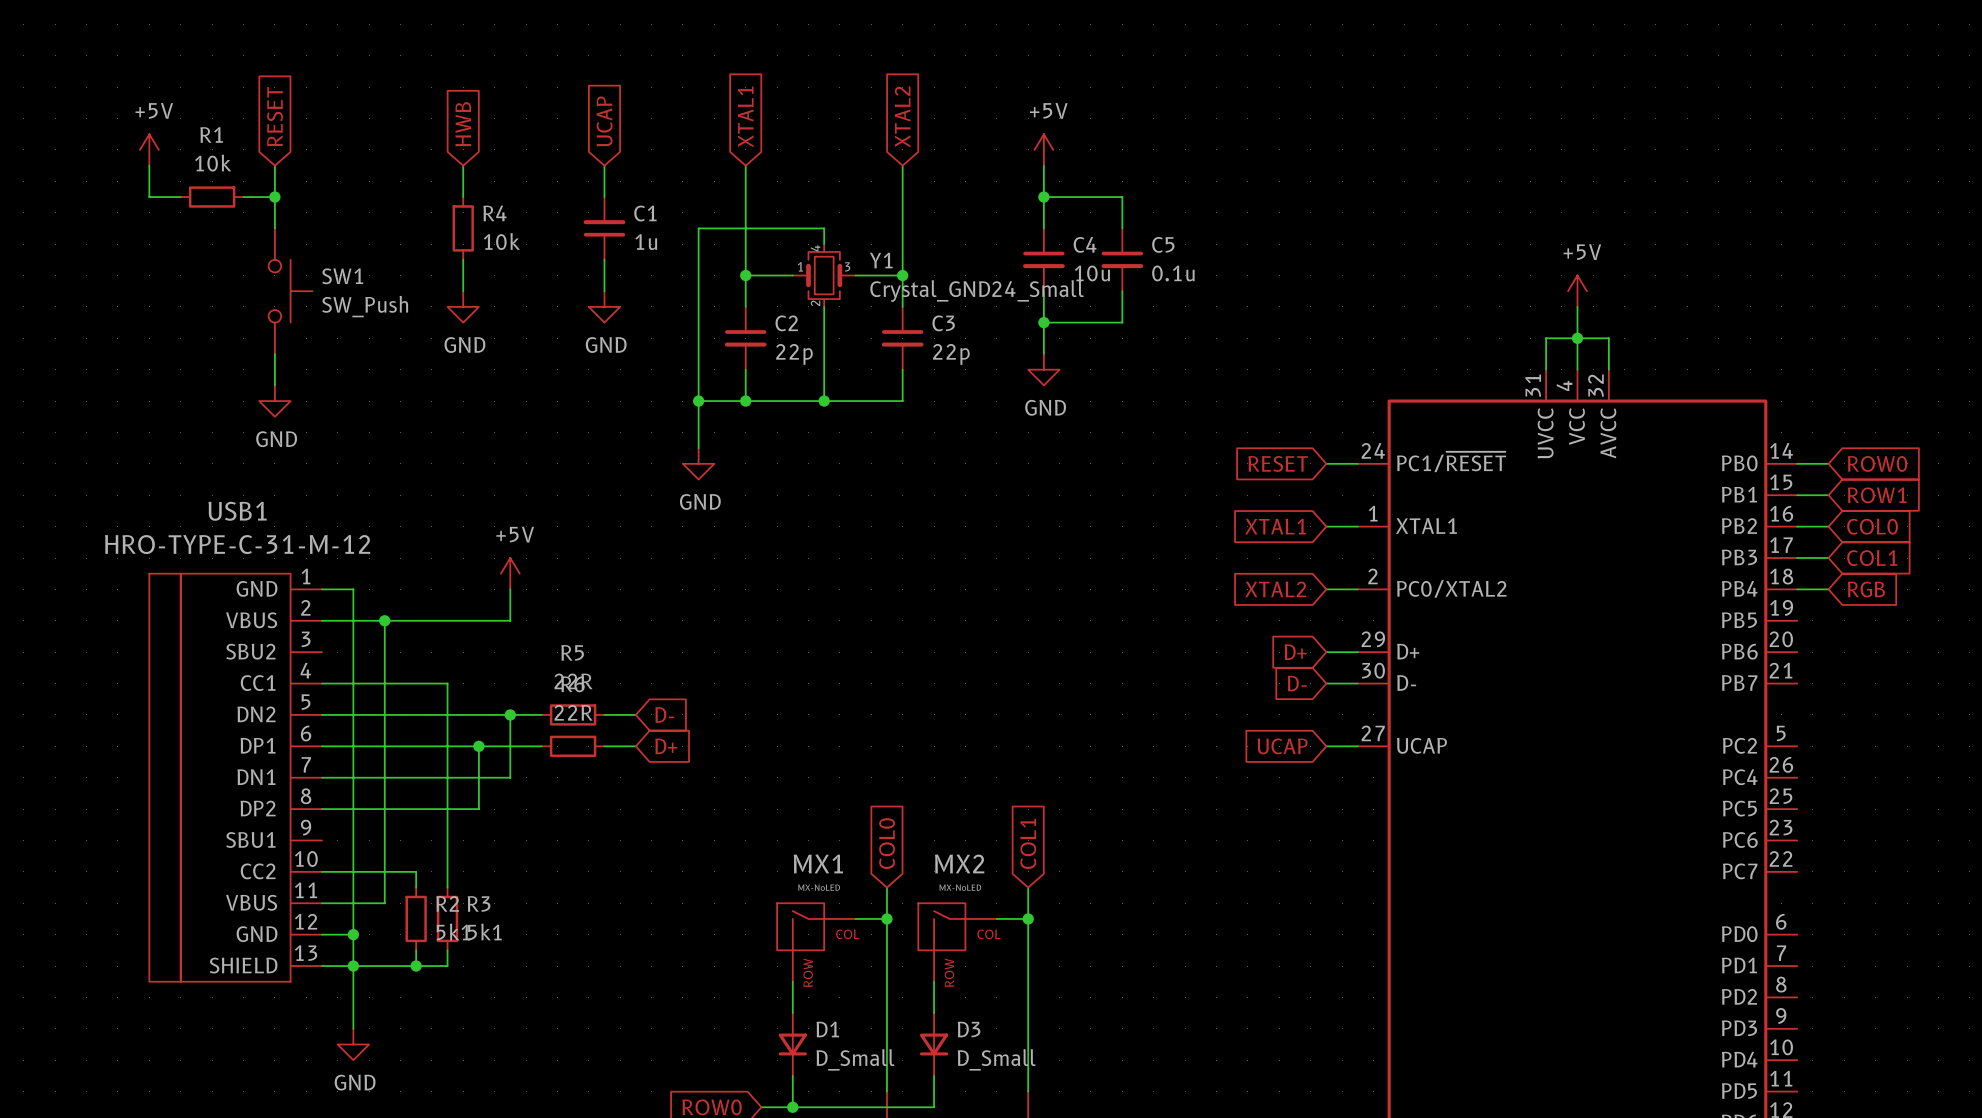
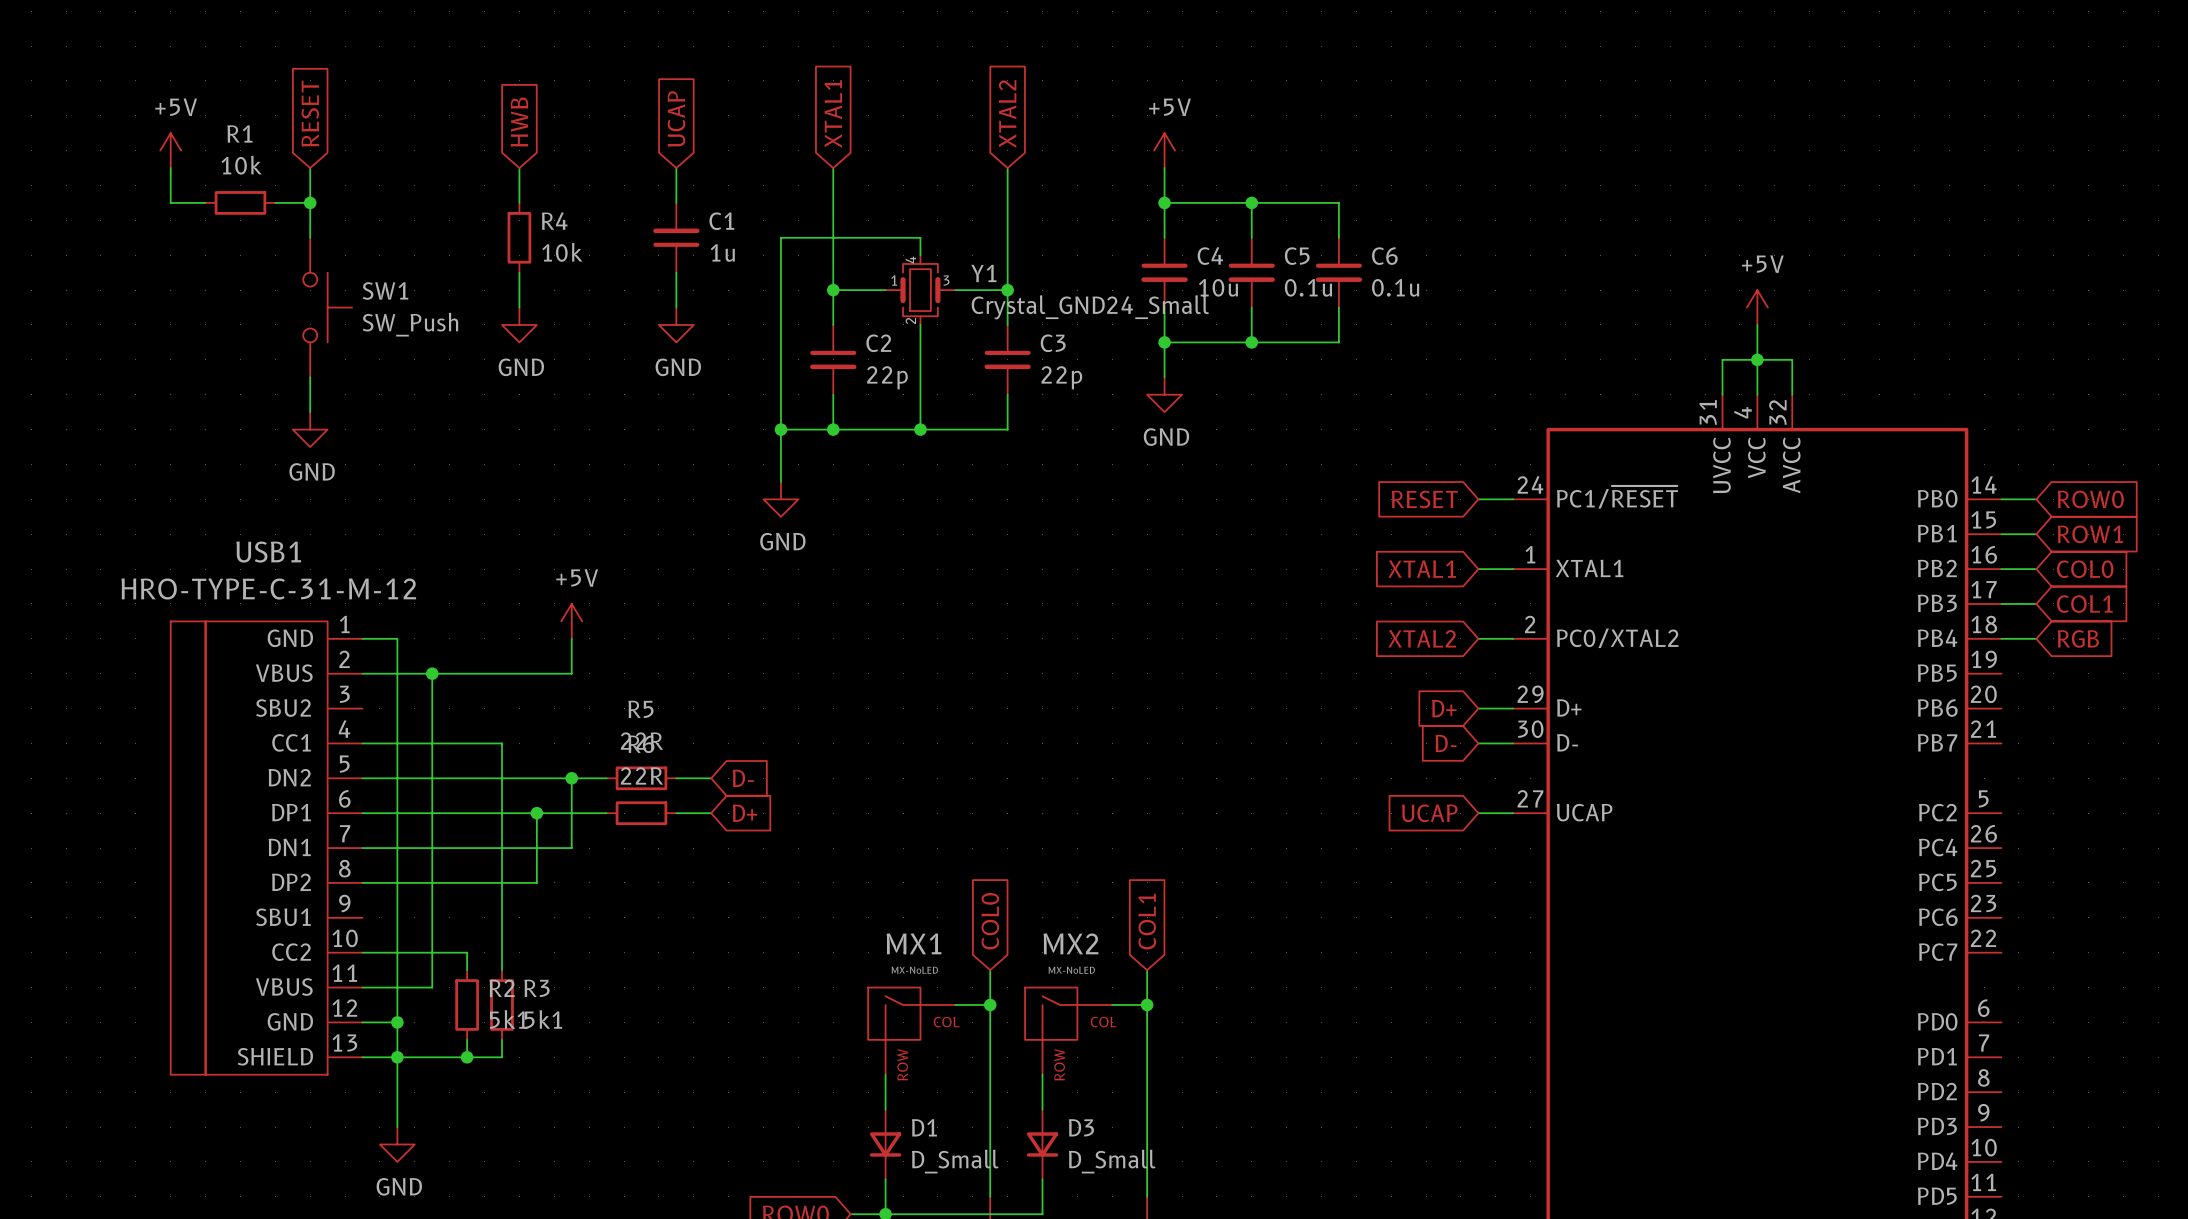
wire: none -> (1251, 202) (1338, 202) (1338, 237)
junction: none -> (1251, 202)
C6: none -> 0.1u (1338, 272)
wire: none -> (1338, 307) (1338, 342) (1251, 342)
junction: none -> (1251, 342)

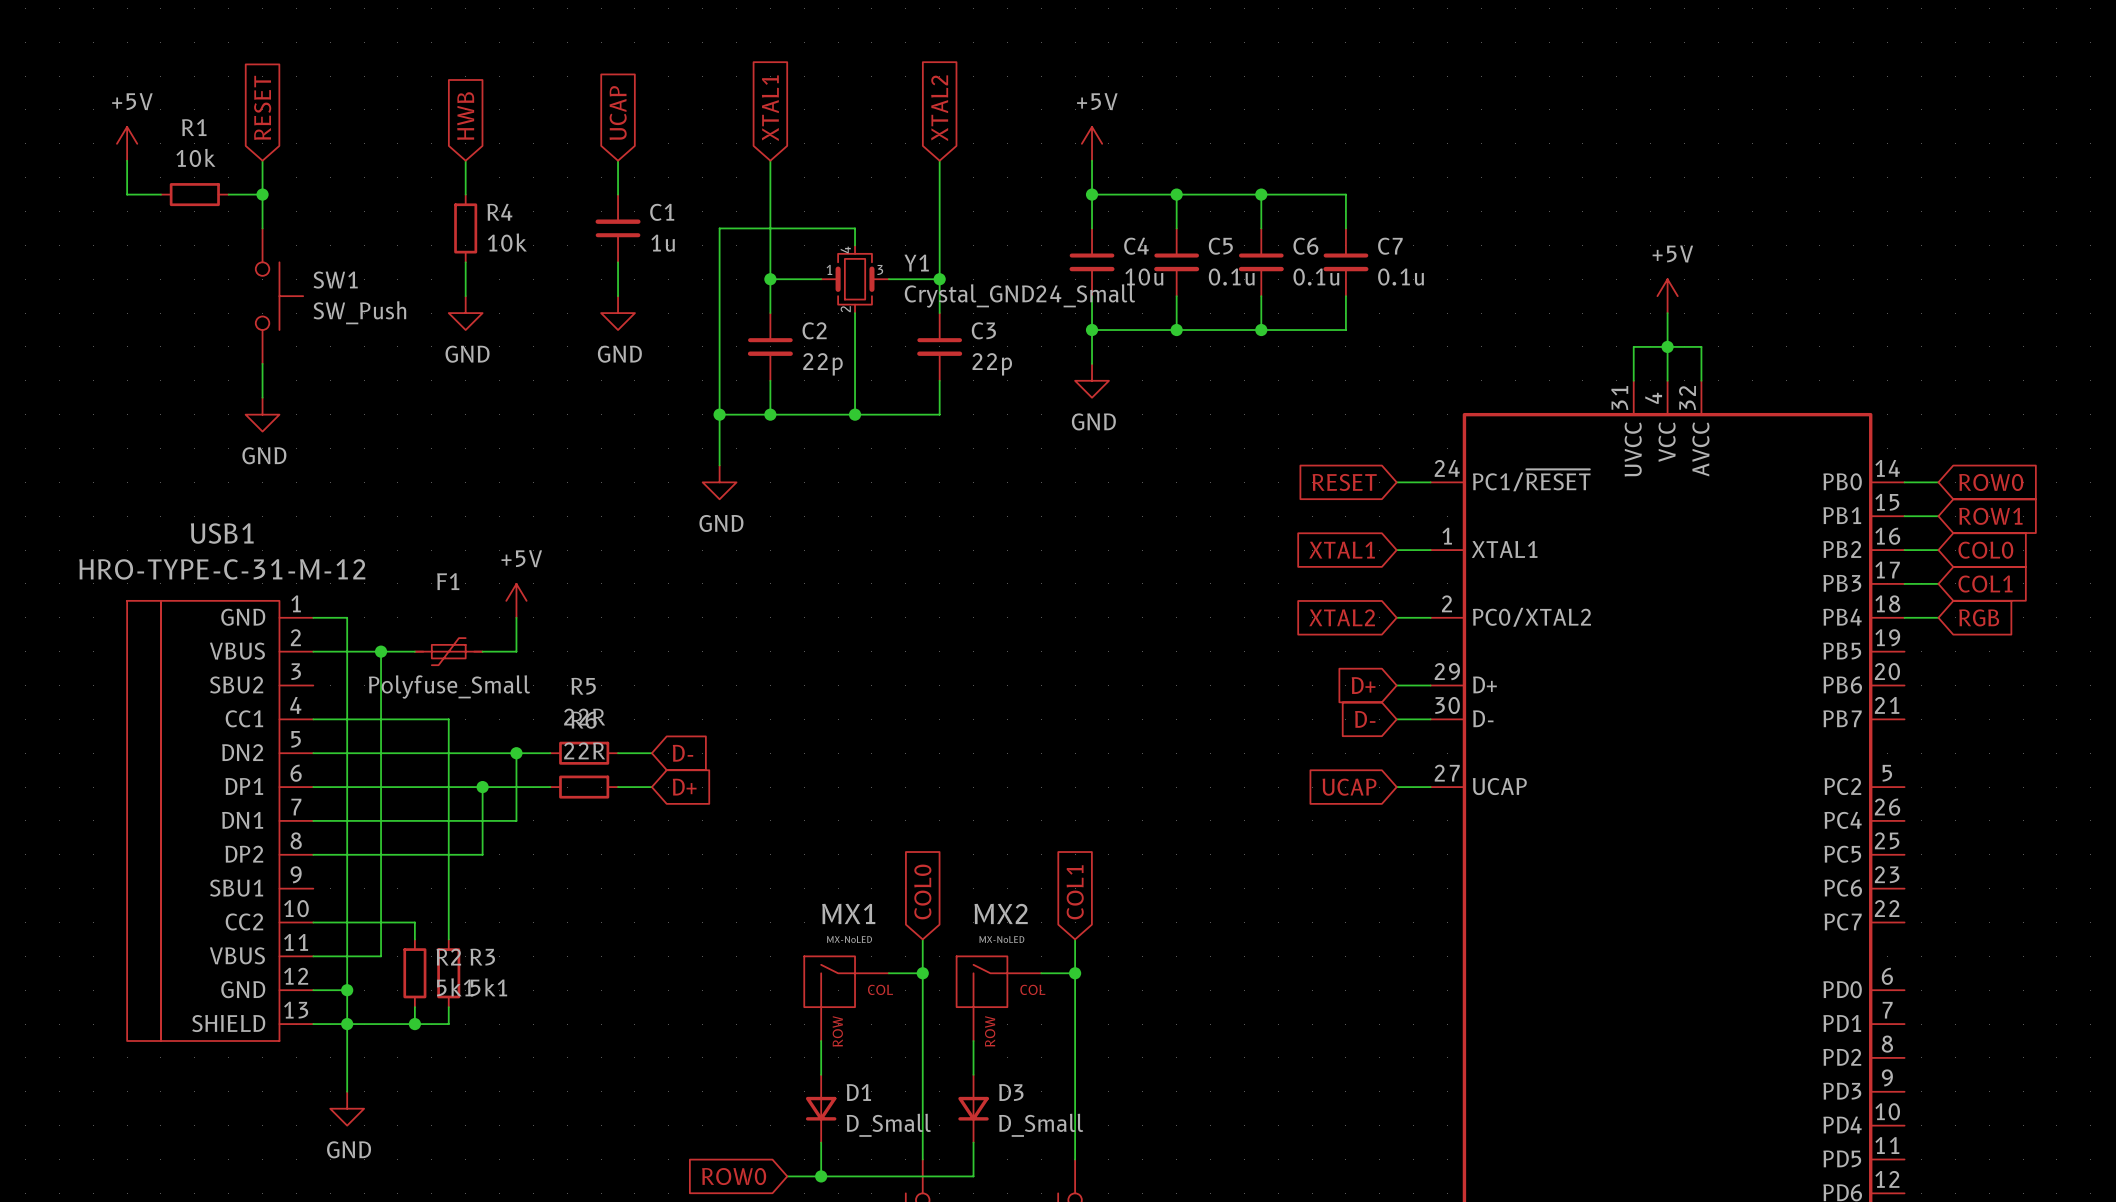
wire: none -> (1261, 194) (1345, 194) (1345, 228)
junction: none -> (1261, 194)
C7: none -> 0.1u (1345, 262)
wire: none -> (1345, 296) (1345, 330) (1261, 330)
junction: none -> (1261, 330)
F1: none -> Polyfuse_Small (448, 651)

